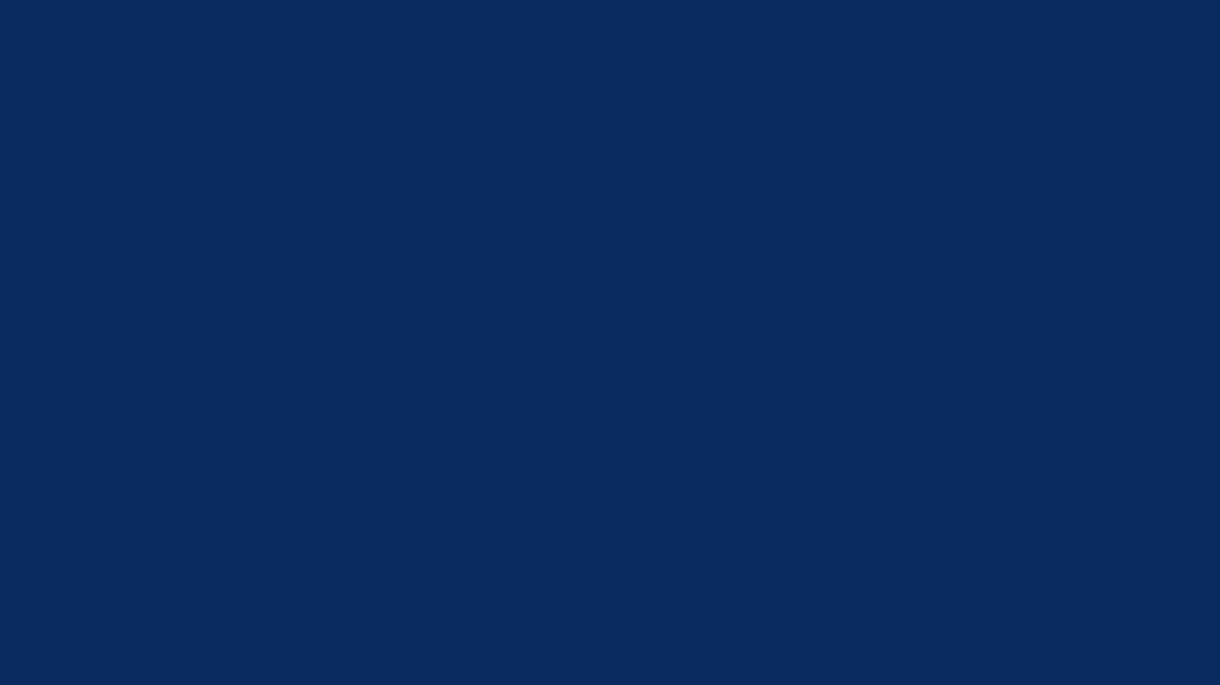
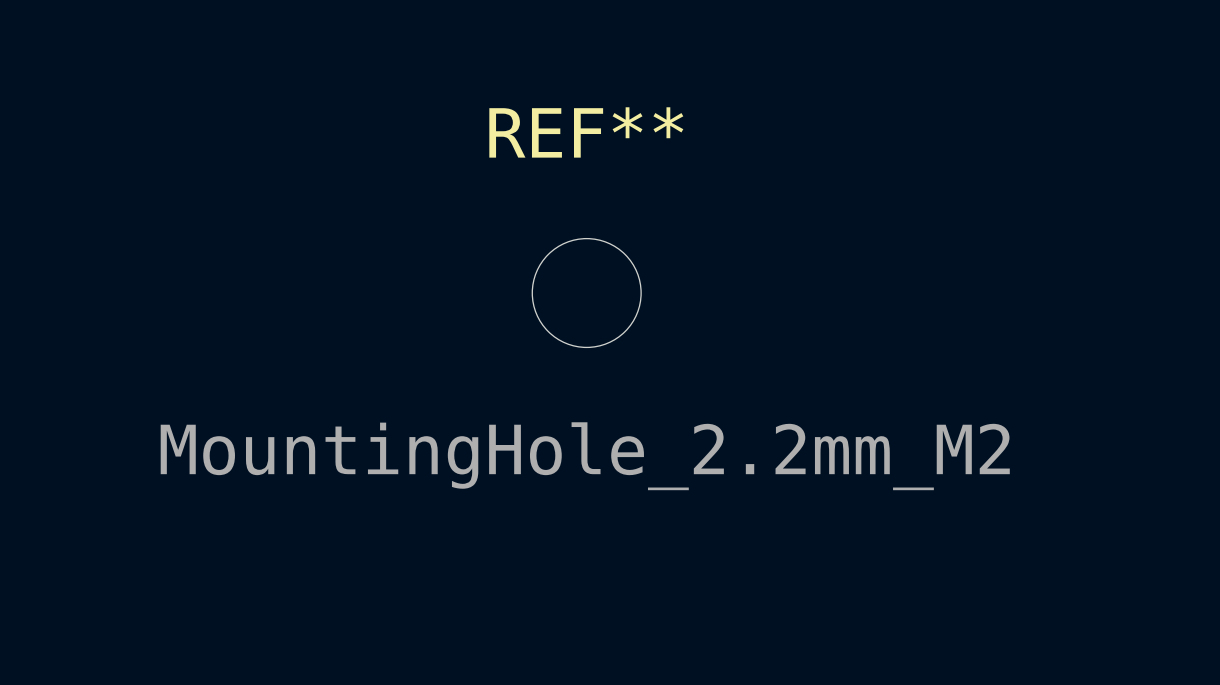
REF**: none -> MountingHole_2.2mm_M2 (586, 293)

